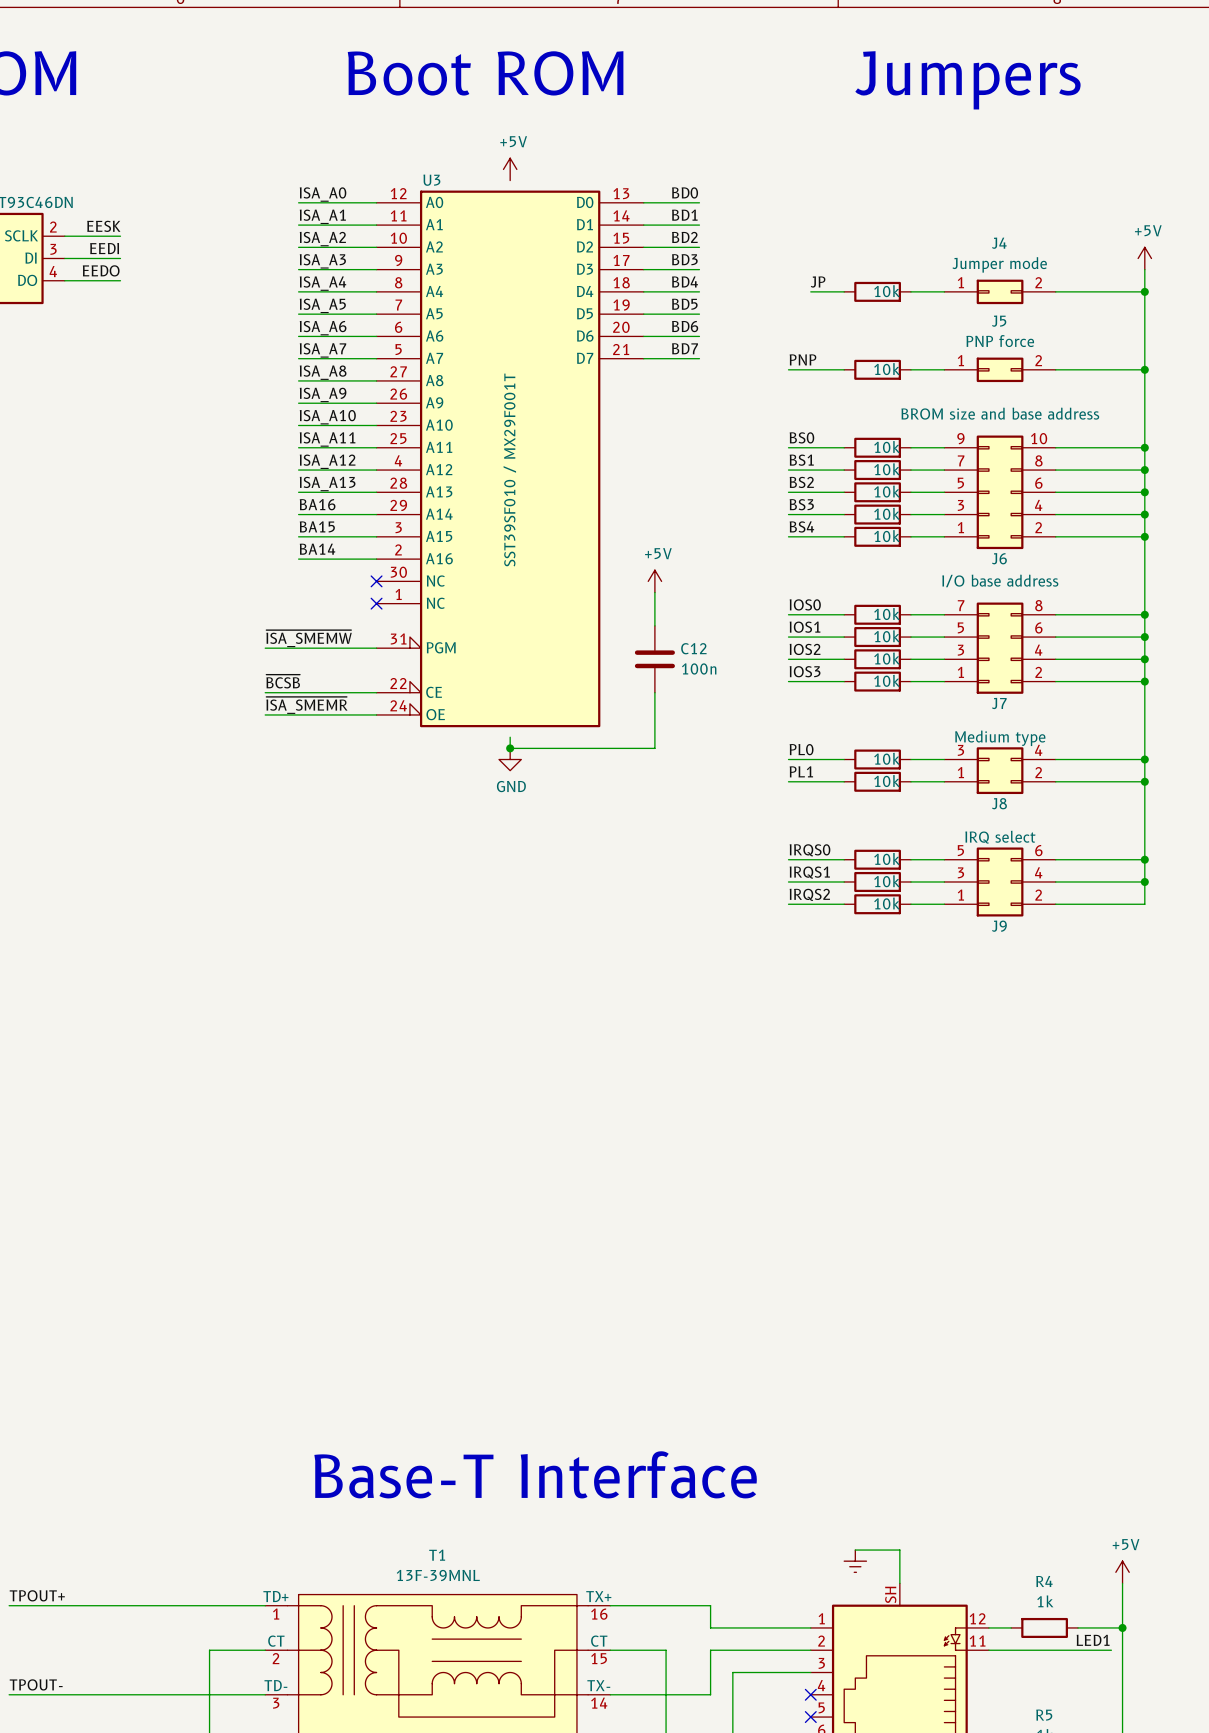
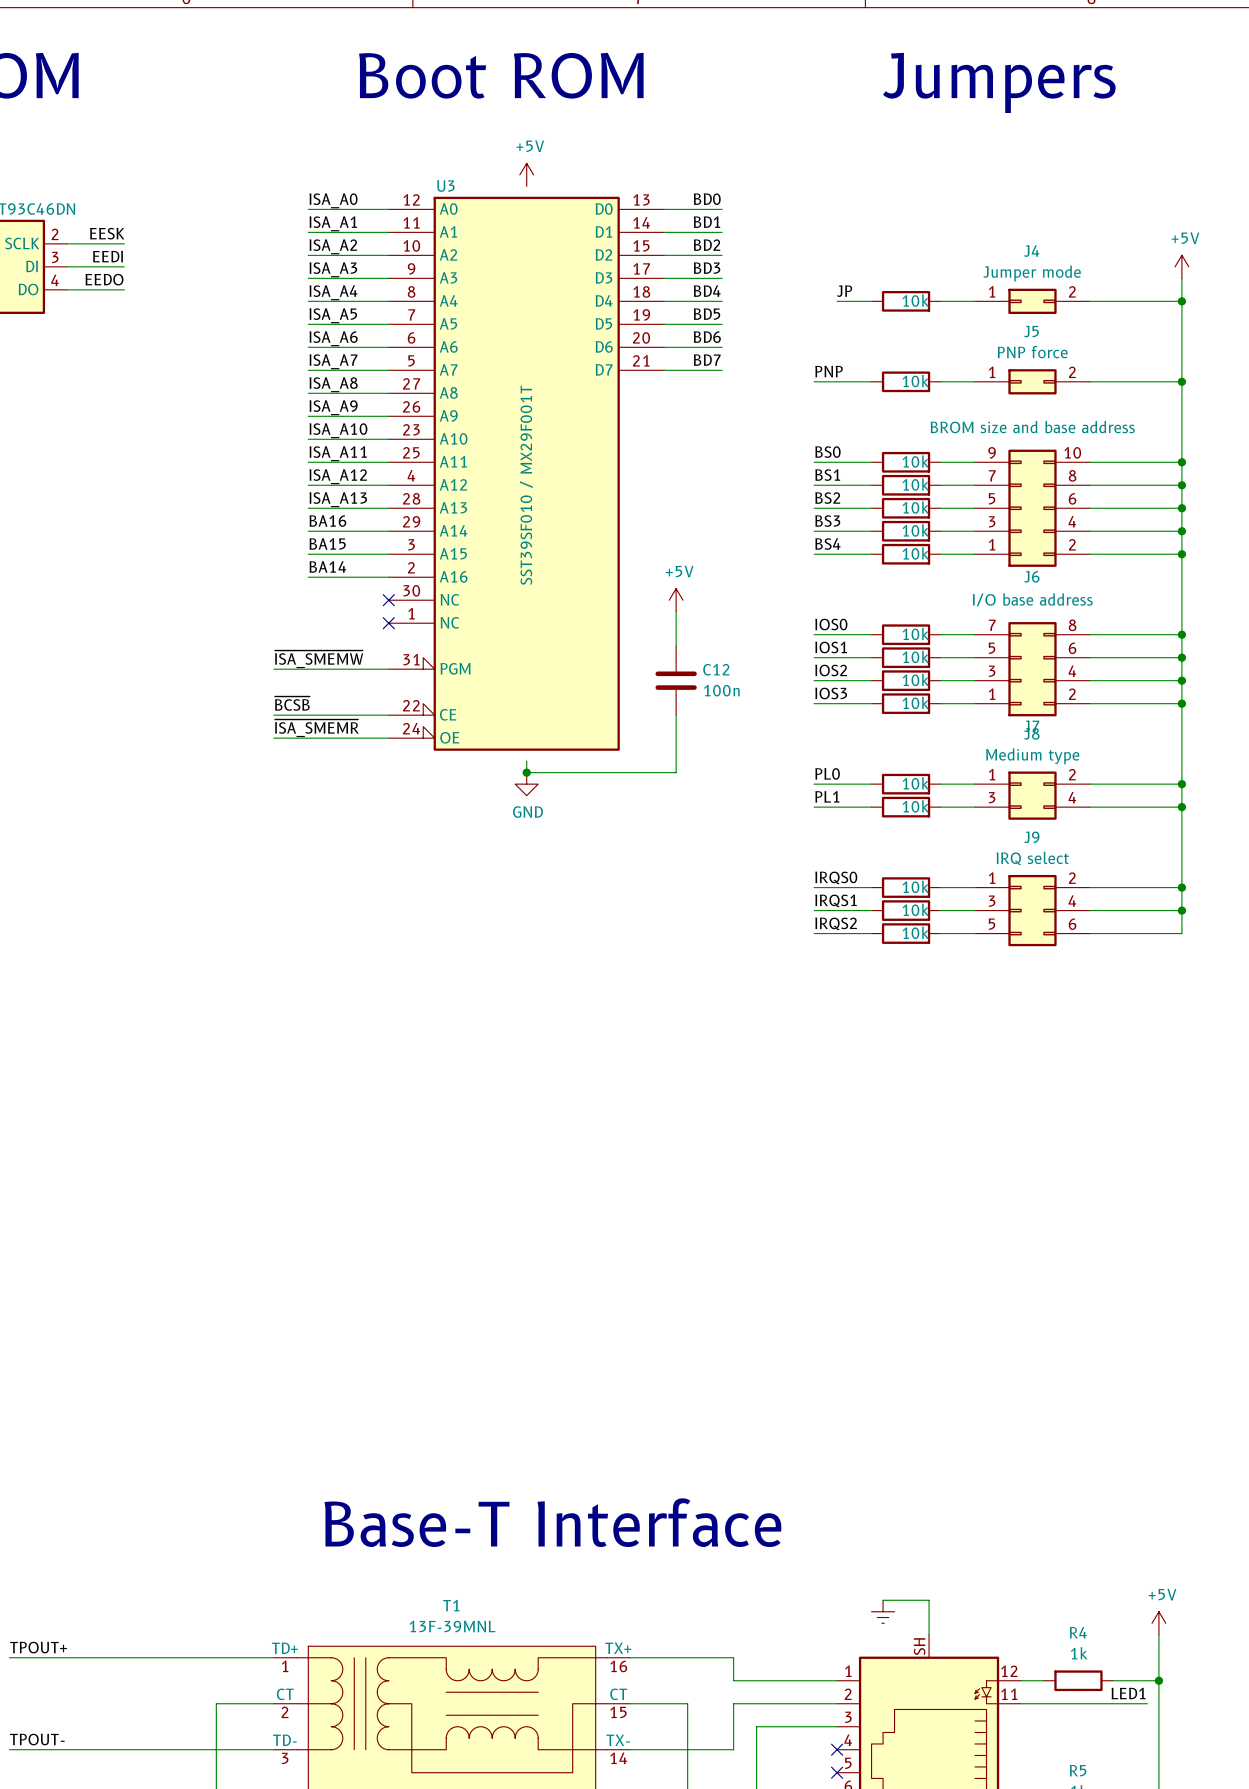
J8 flip: as is (1000, 770) -> up-down (1032, 795)
J8 name position: J8 (999, 803) -> J8 (1031, 733)
J9 flip: as is (1000, 881) -> up-down (1032, 910)
J9 name position: J9 (999, 926) -> J9 (1031, 837)

